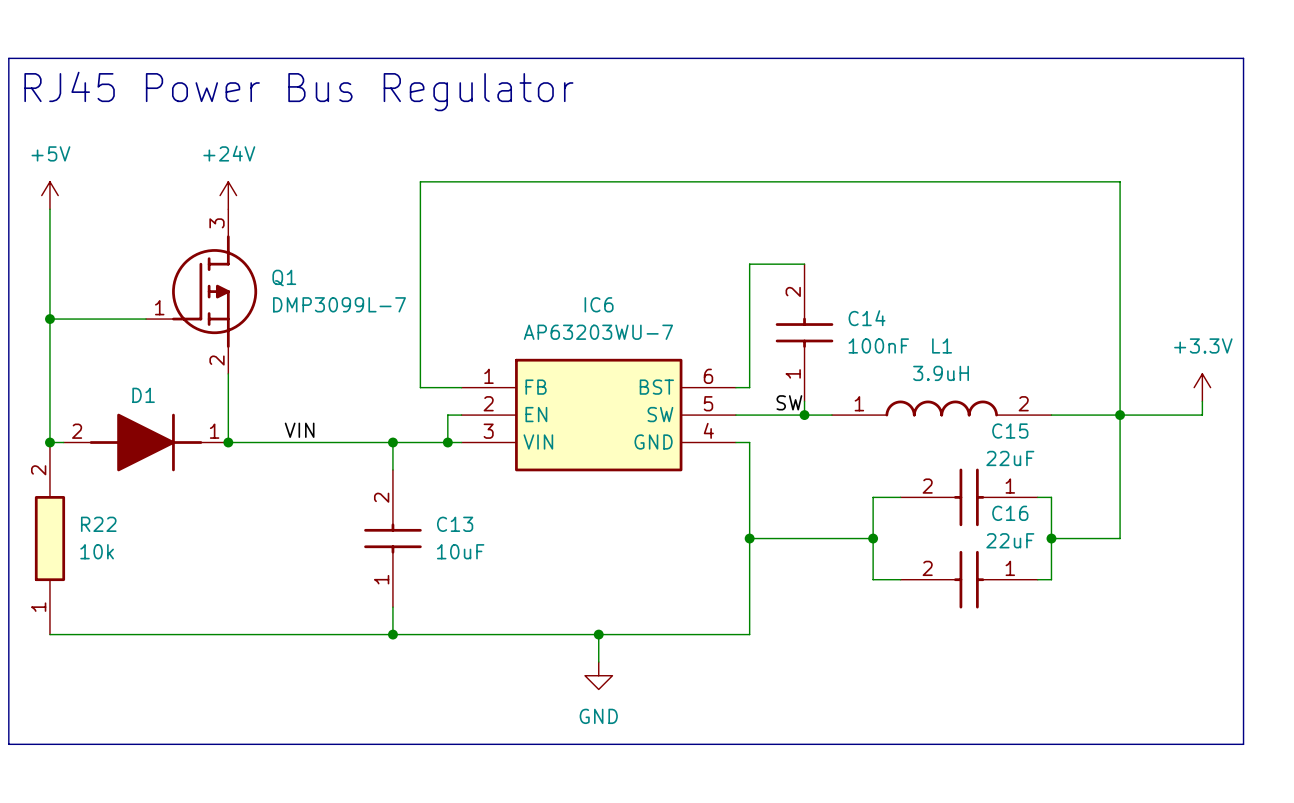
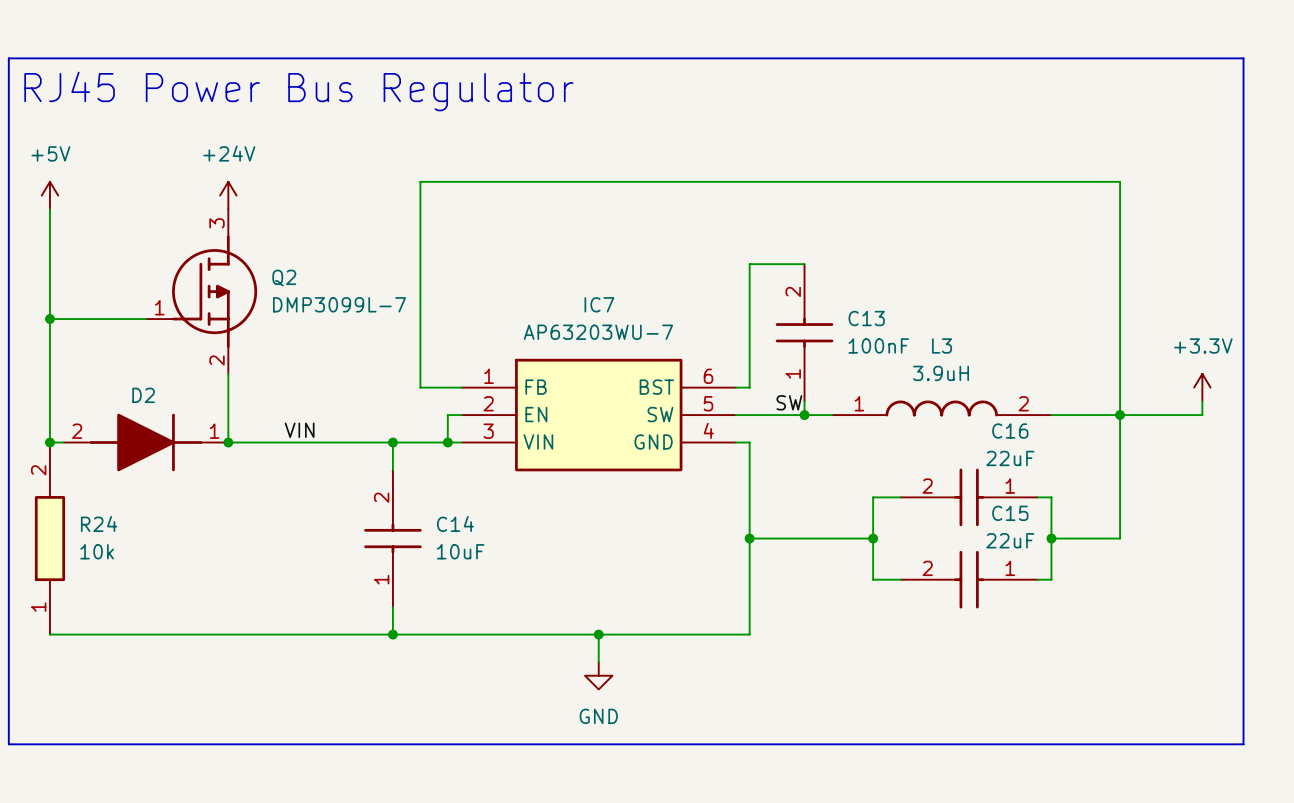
Q1 name: Q1 (284, 278) -> Q2 (284, 278)
IC6 name: IC6 (599, 304) -> IC7 (599, 304)
C14 name: C14 (867, 318) -> C13 (866, 318)
L1 name: L1 (942, 345) -> L3 (942, 345)
D1 name: D1 (143, 395) -> D2 (143, 395)
C15 name: C15 (1010, 431) -> C16 (1010, 431)
C16 name: C16 (1010, 513) -> C15 (1010, 513)
R22 name: R22 (98, 524) -> R24 (99, 523)
C13 name: C13 (455, 524) -> C14 (455, 523)

